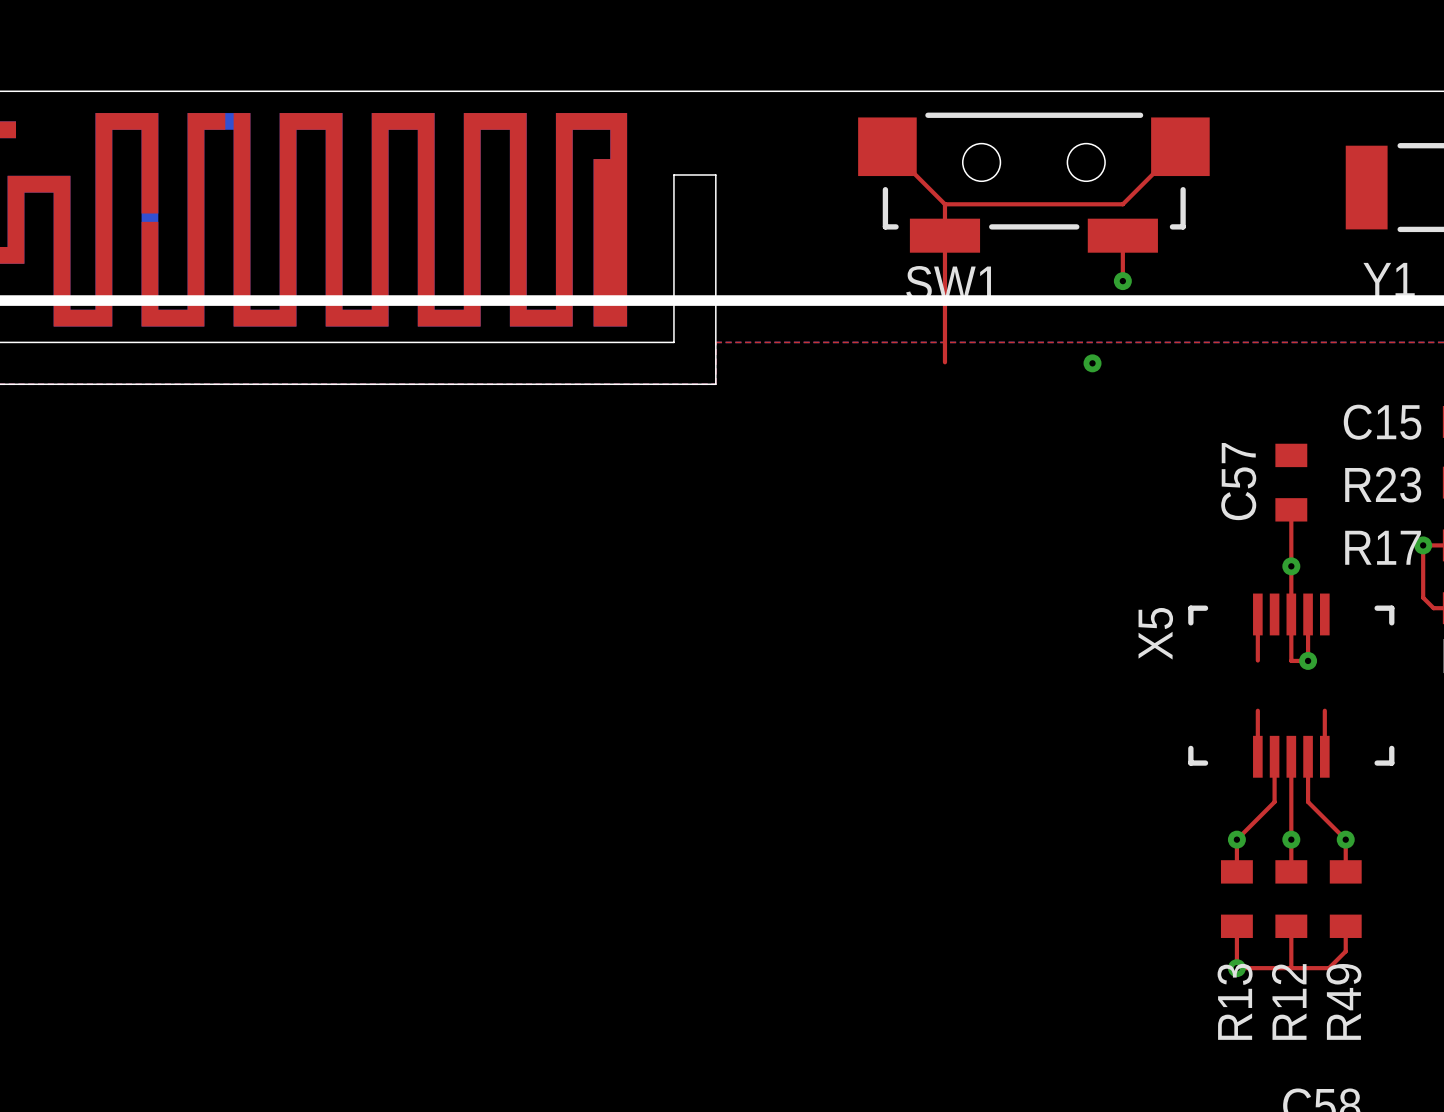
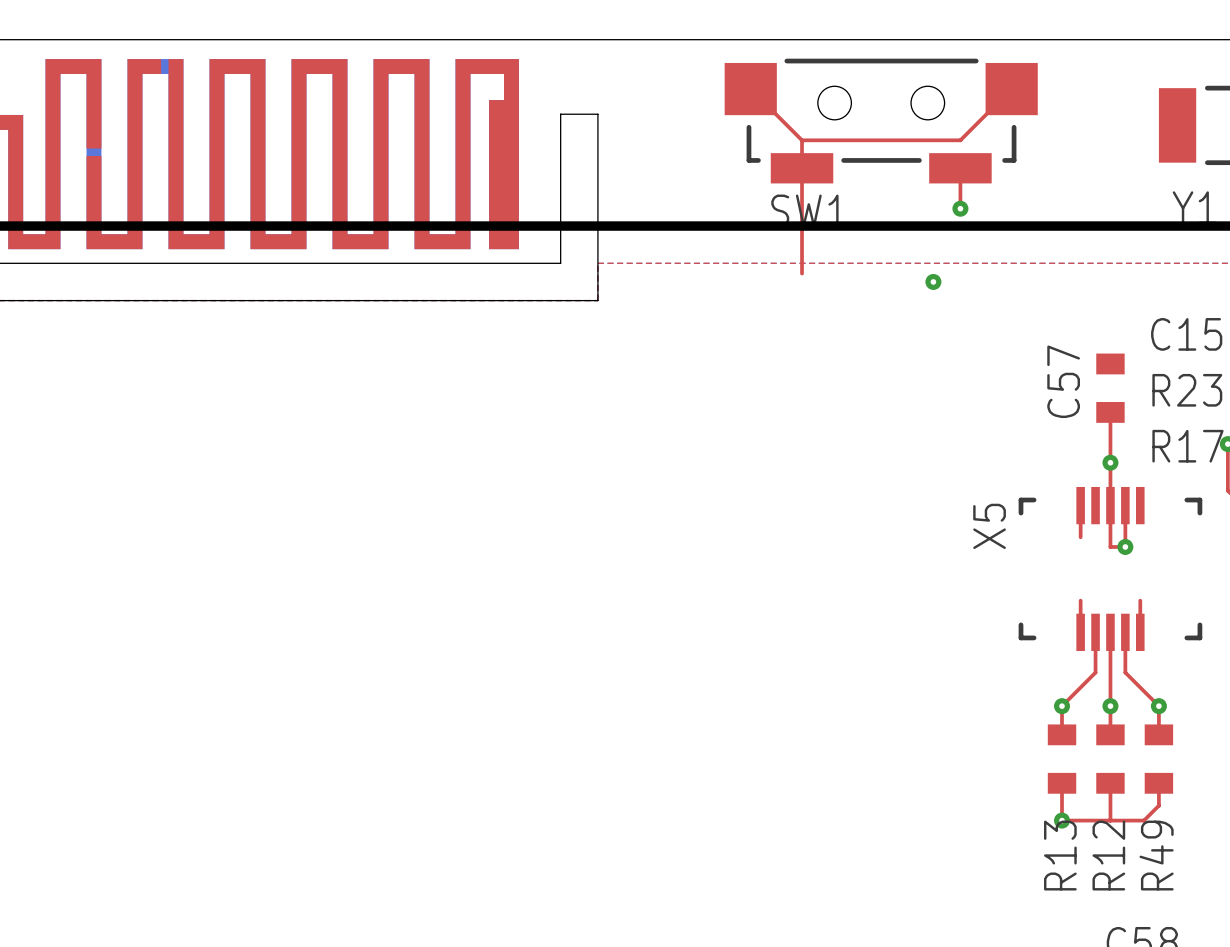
top track: (944, 353) (944, 362) -> none
top track: (1257, 650) (1257, 660) -> none
top track: (1257, 710) (1257, 721) -> none
top track: (1324, 710) (1324, 721) -> none

